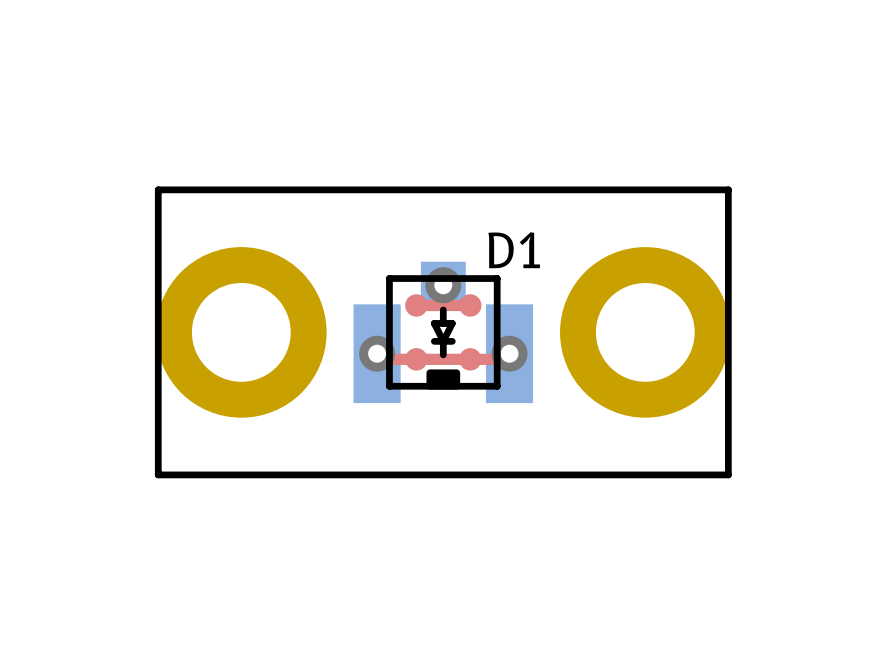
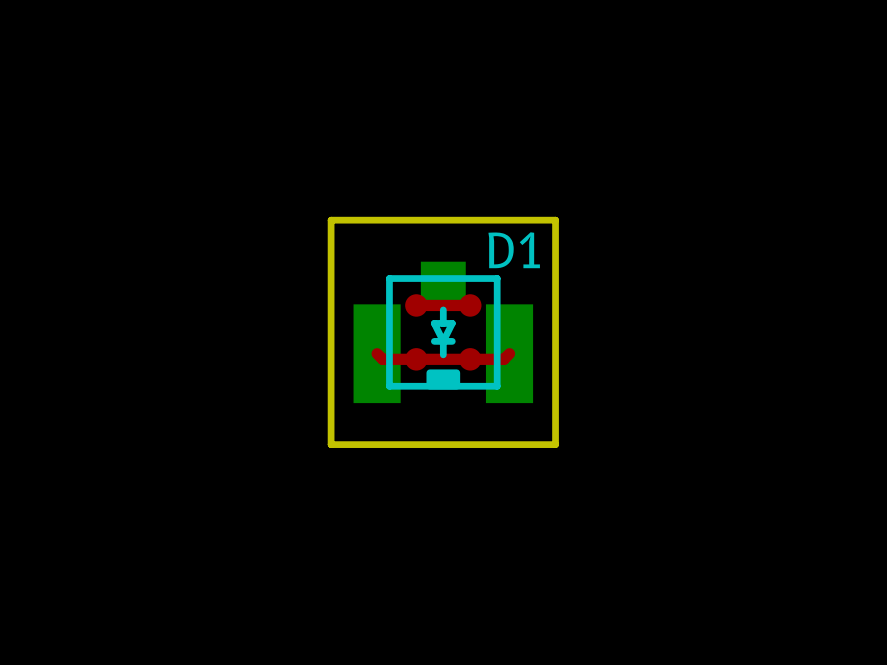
board edge: (158, 189) (158, 474) (728, 474) (728, 189) (158, 189) -> none
board edge: none -> (331, 220) (331, 444) (555, 444) (555, 220) (331, 220)
via: (443, 285) -> none
part: (241, 332) -> none
part: (645, 332) -> none
via: (377, 353) -> none
via: (509, 353) -> none

